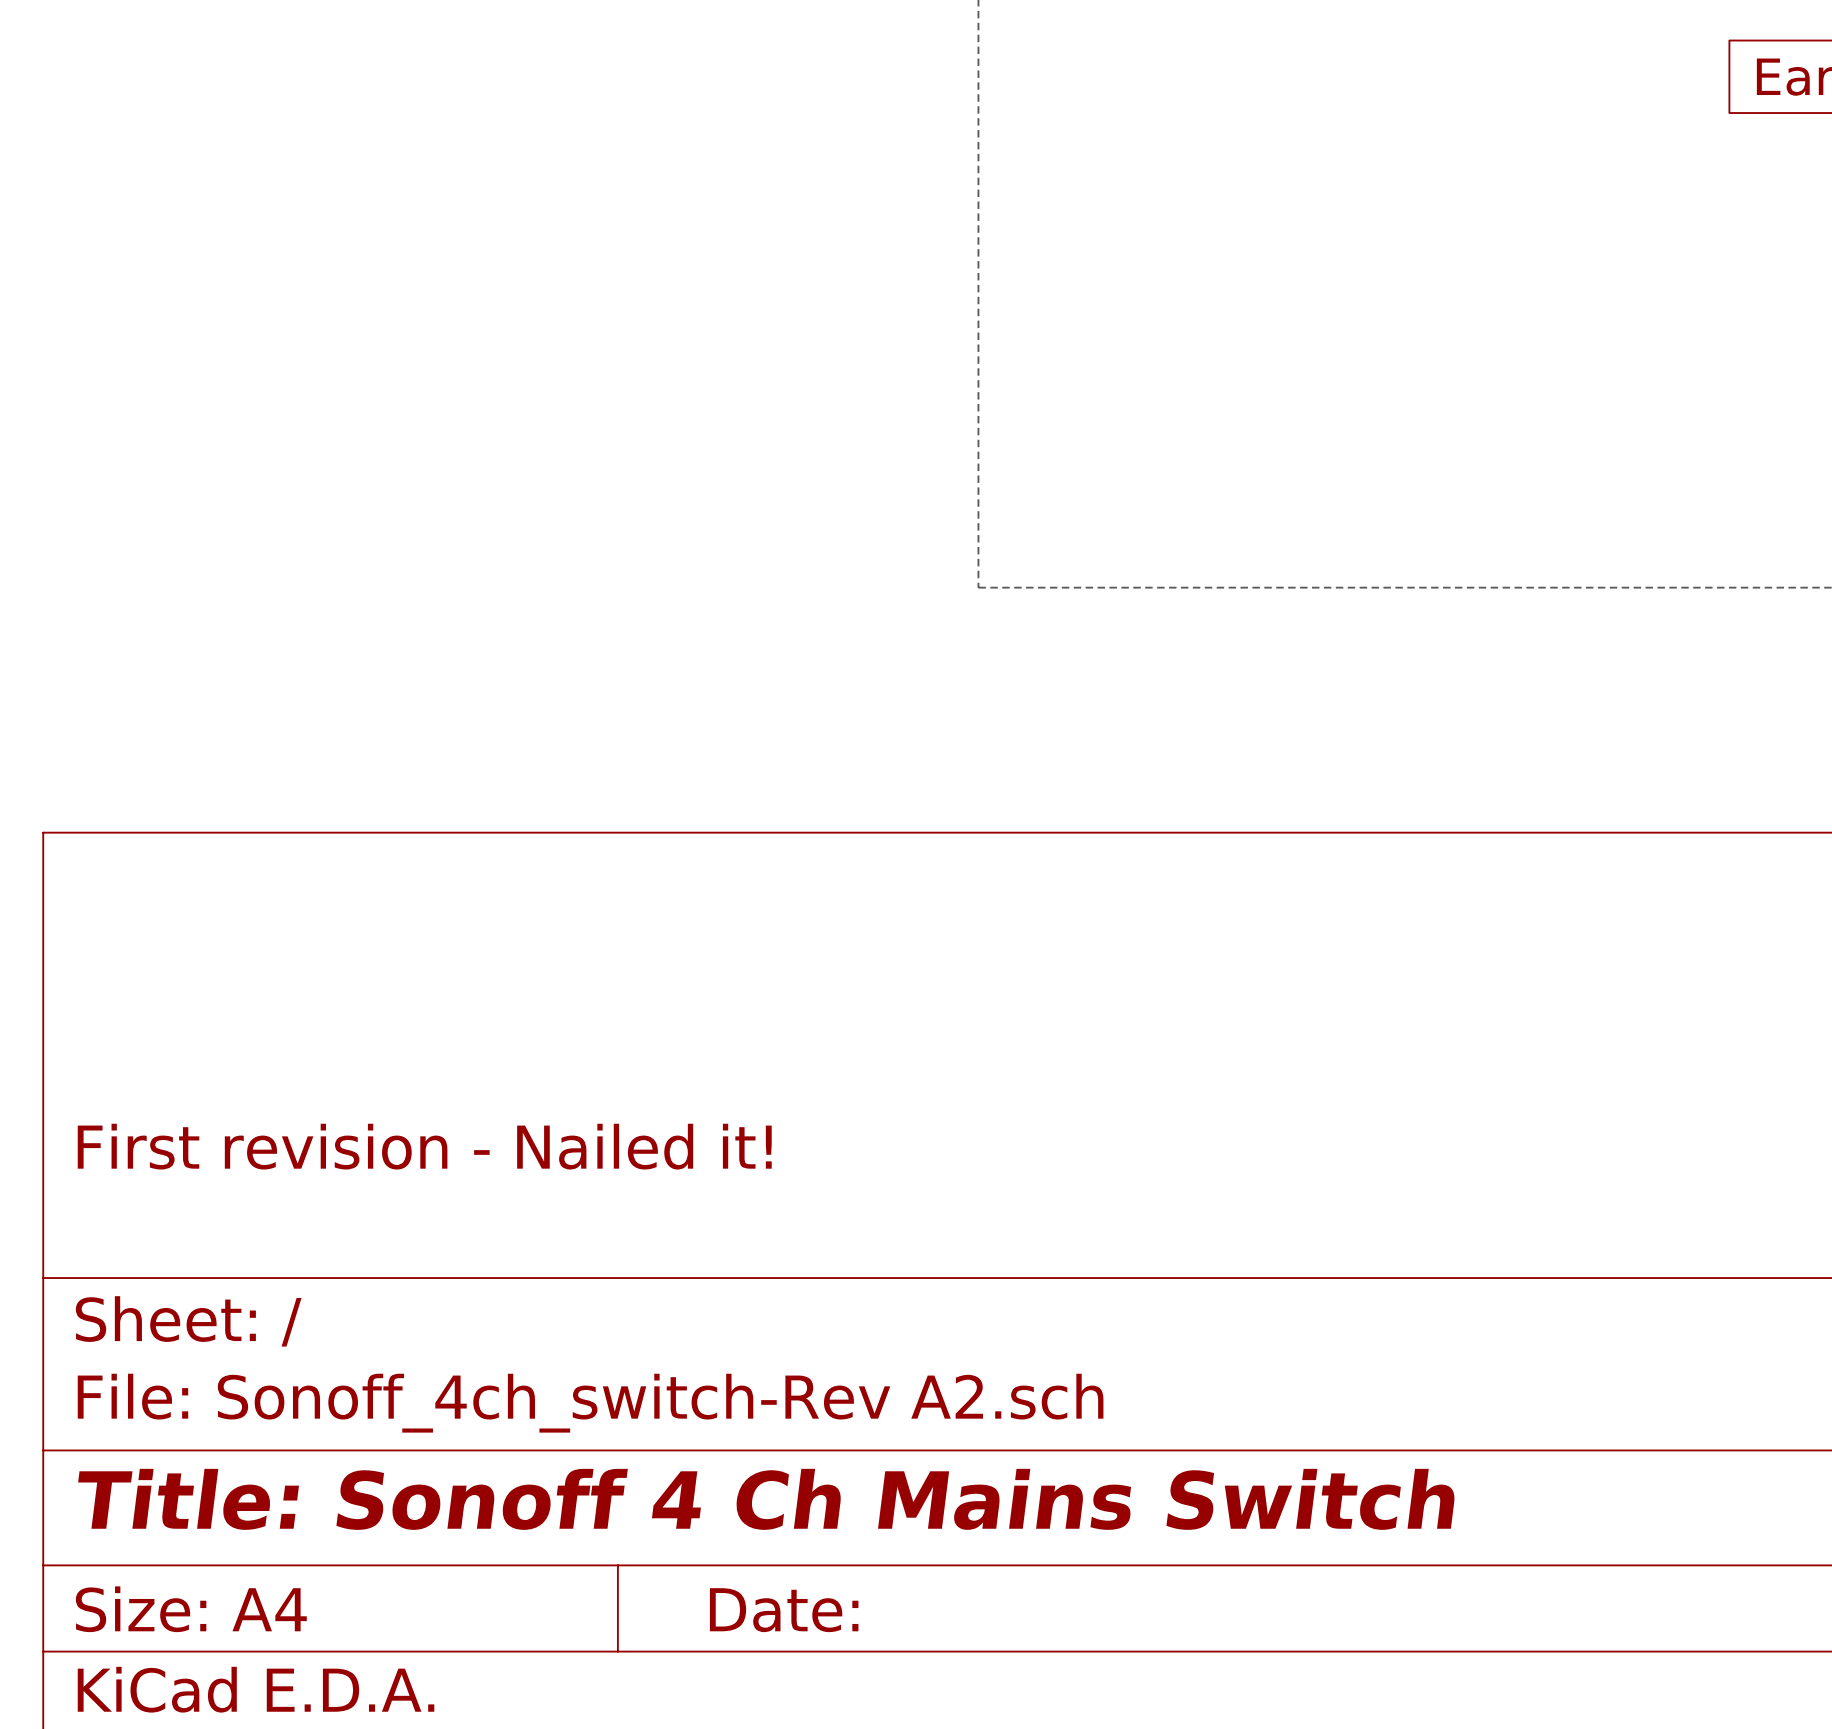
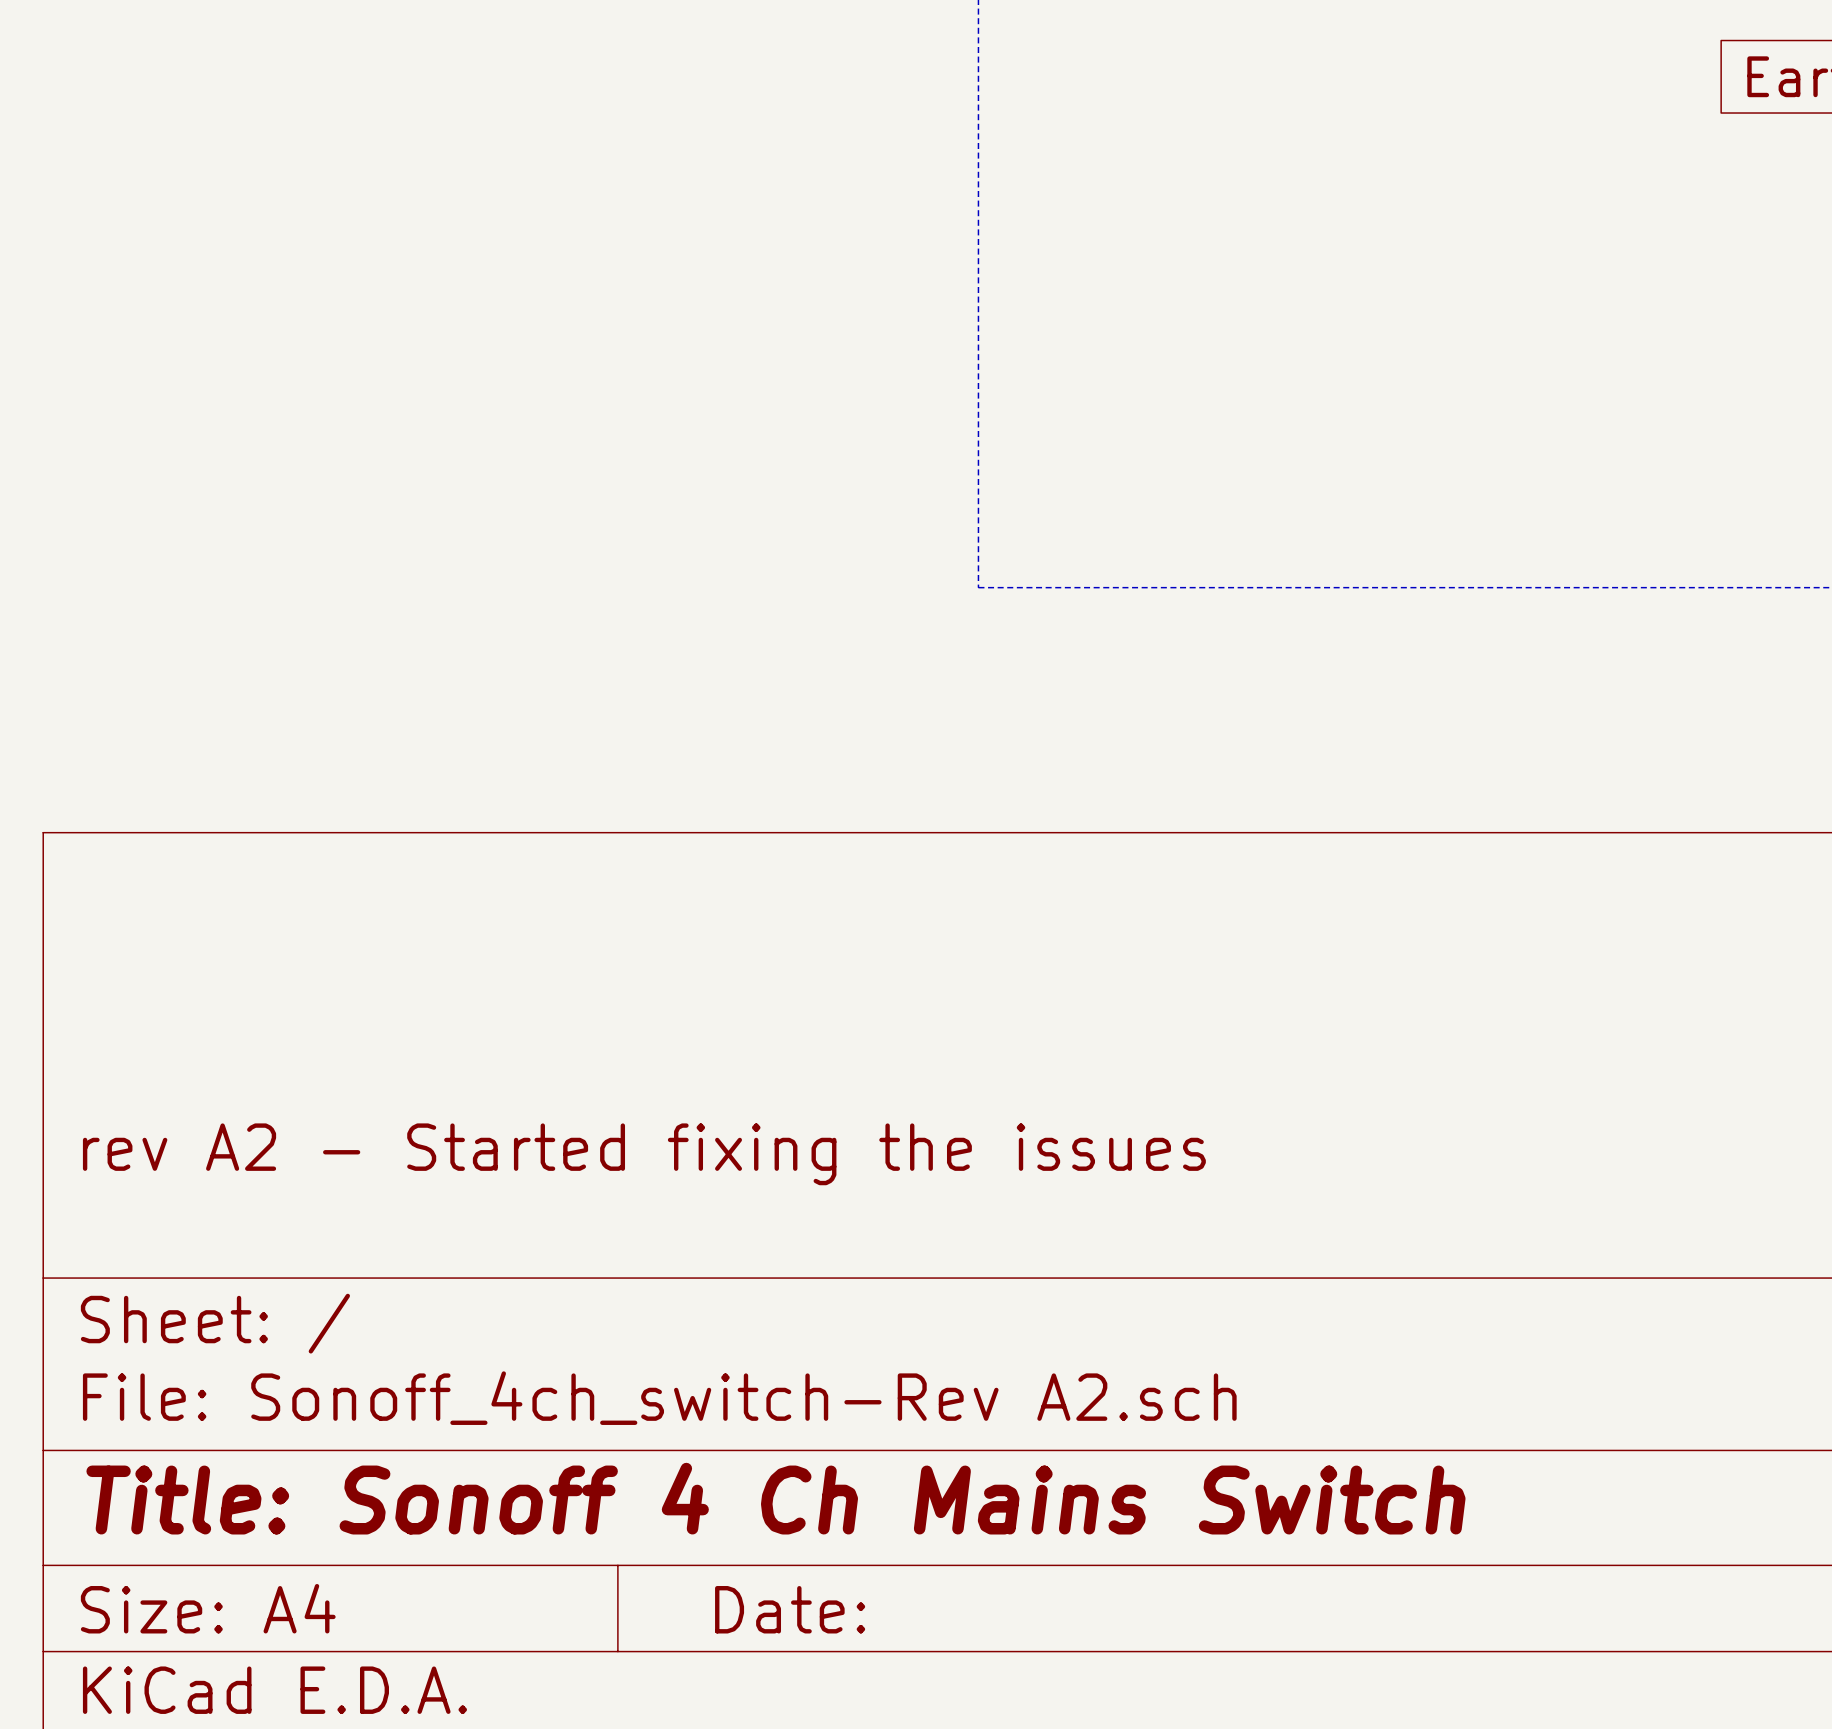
title block: First revision - Nailed it! (424, 1146) -> rev A2 - Started fixing the issues (644, 1154)

